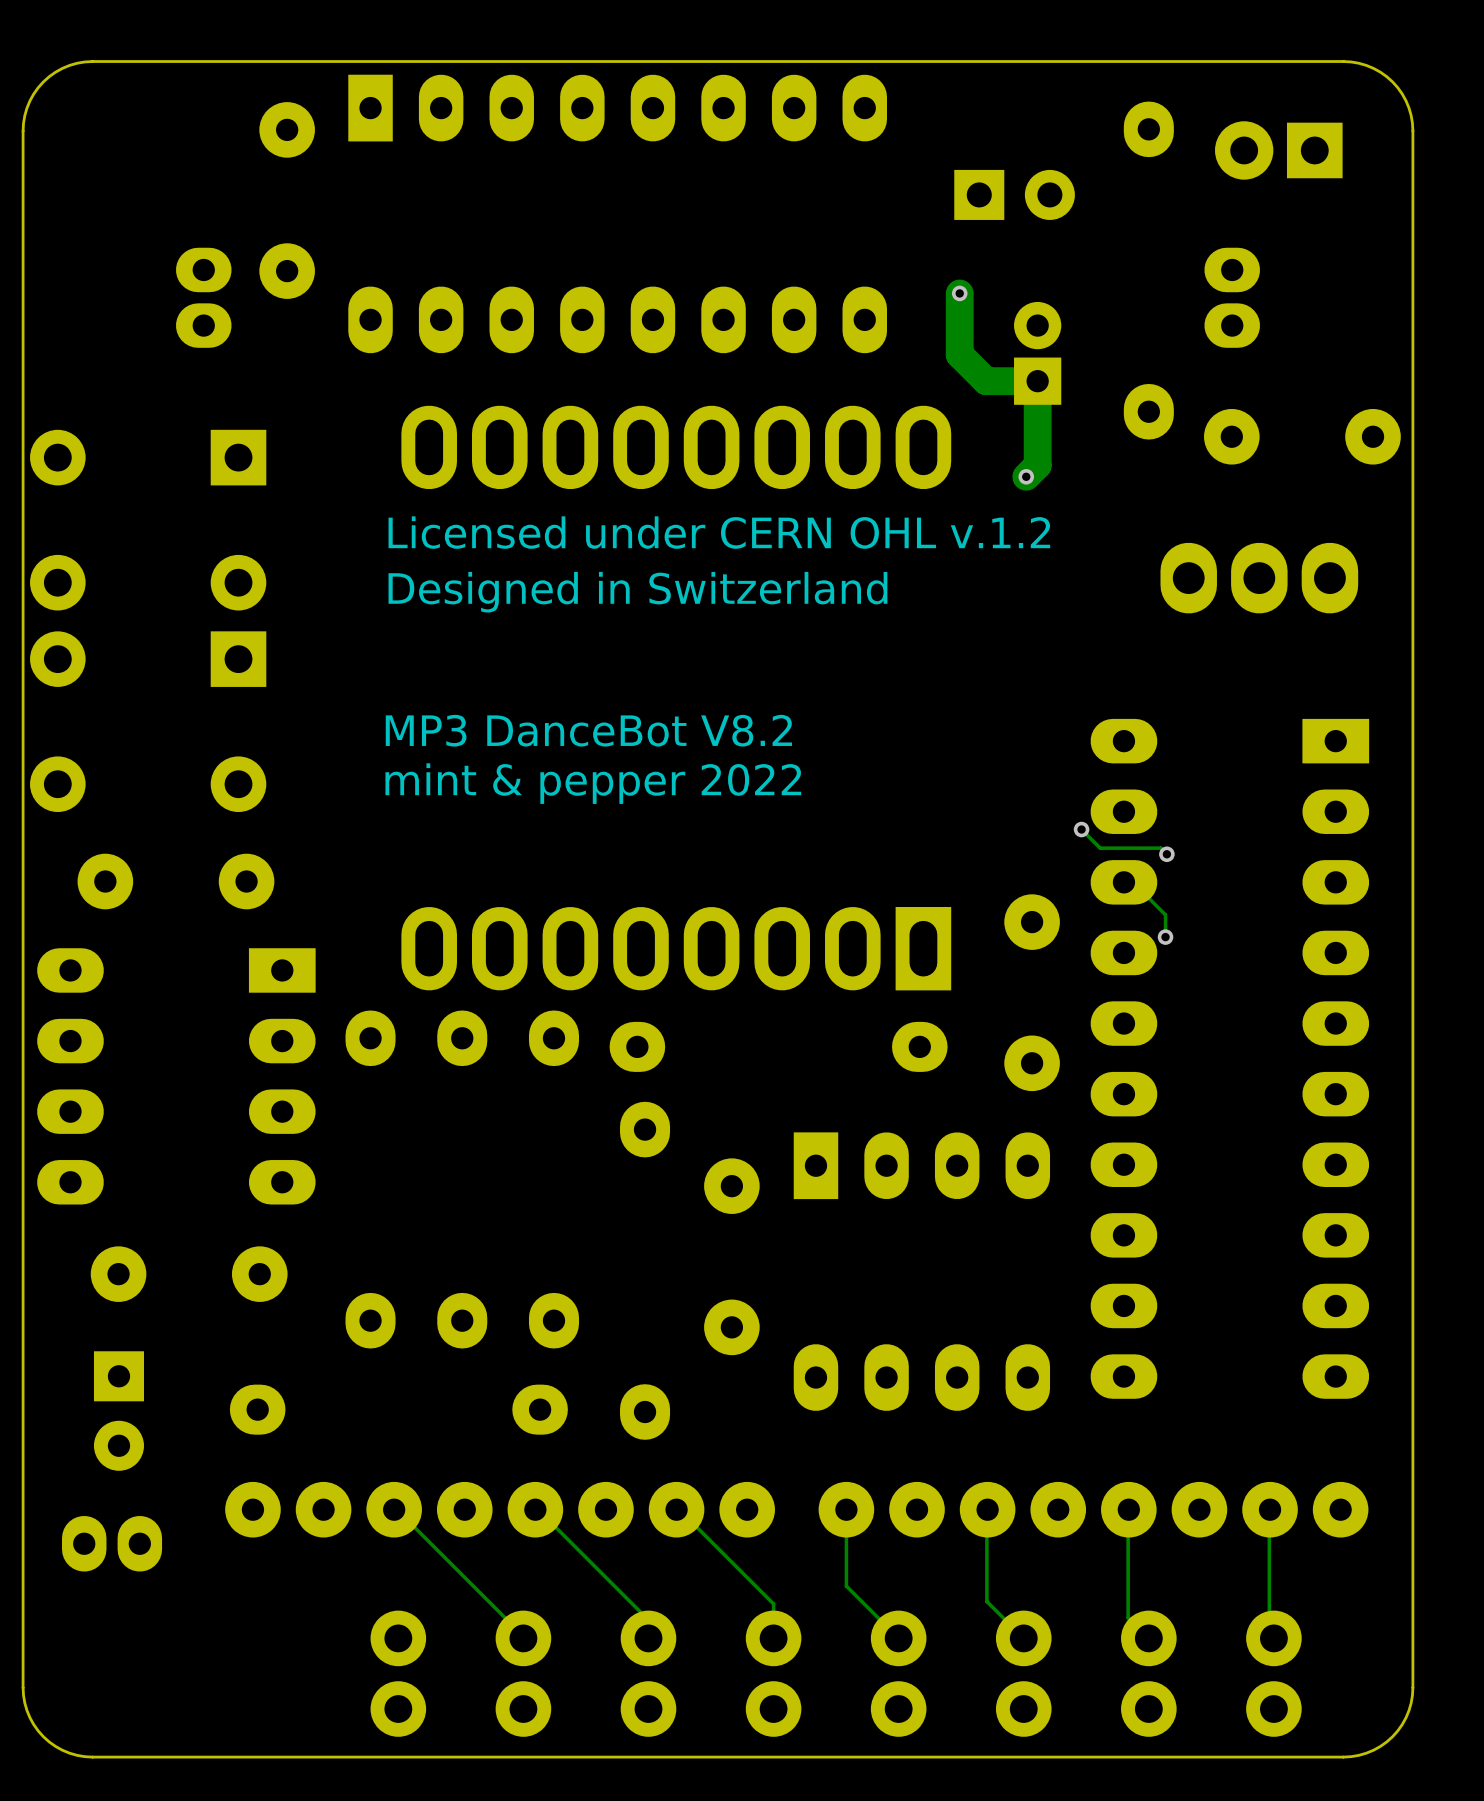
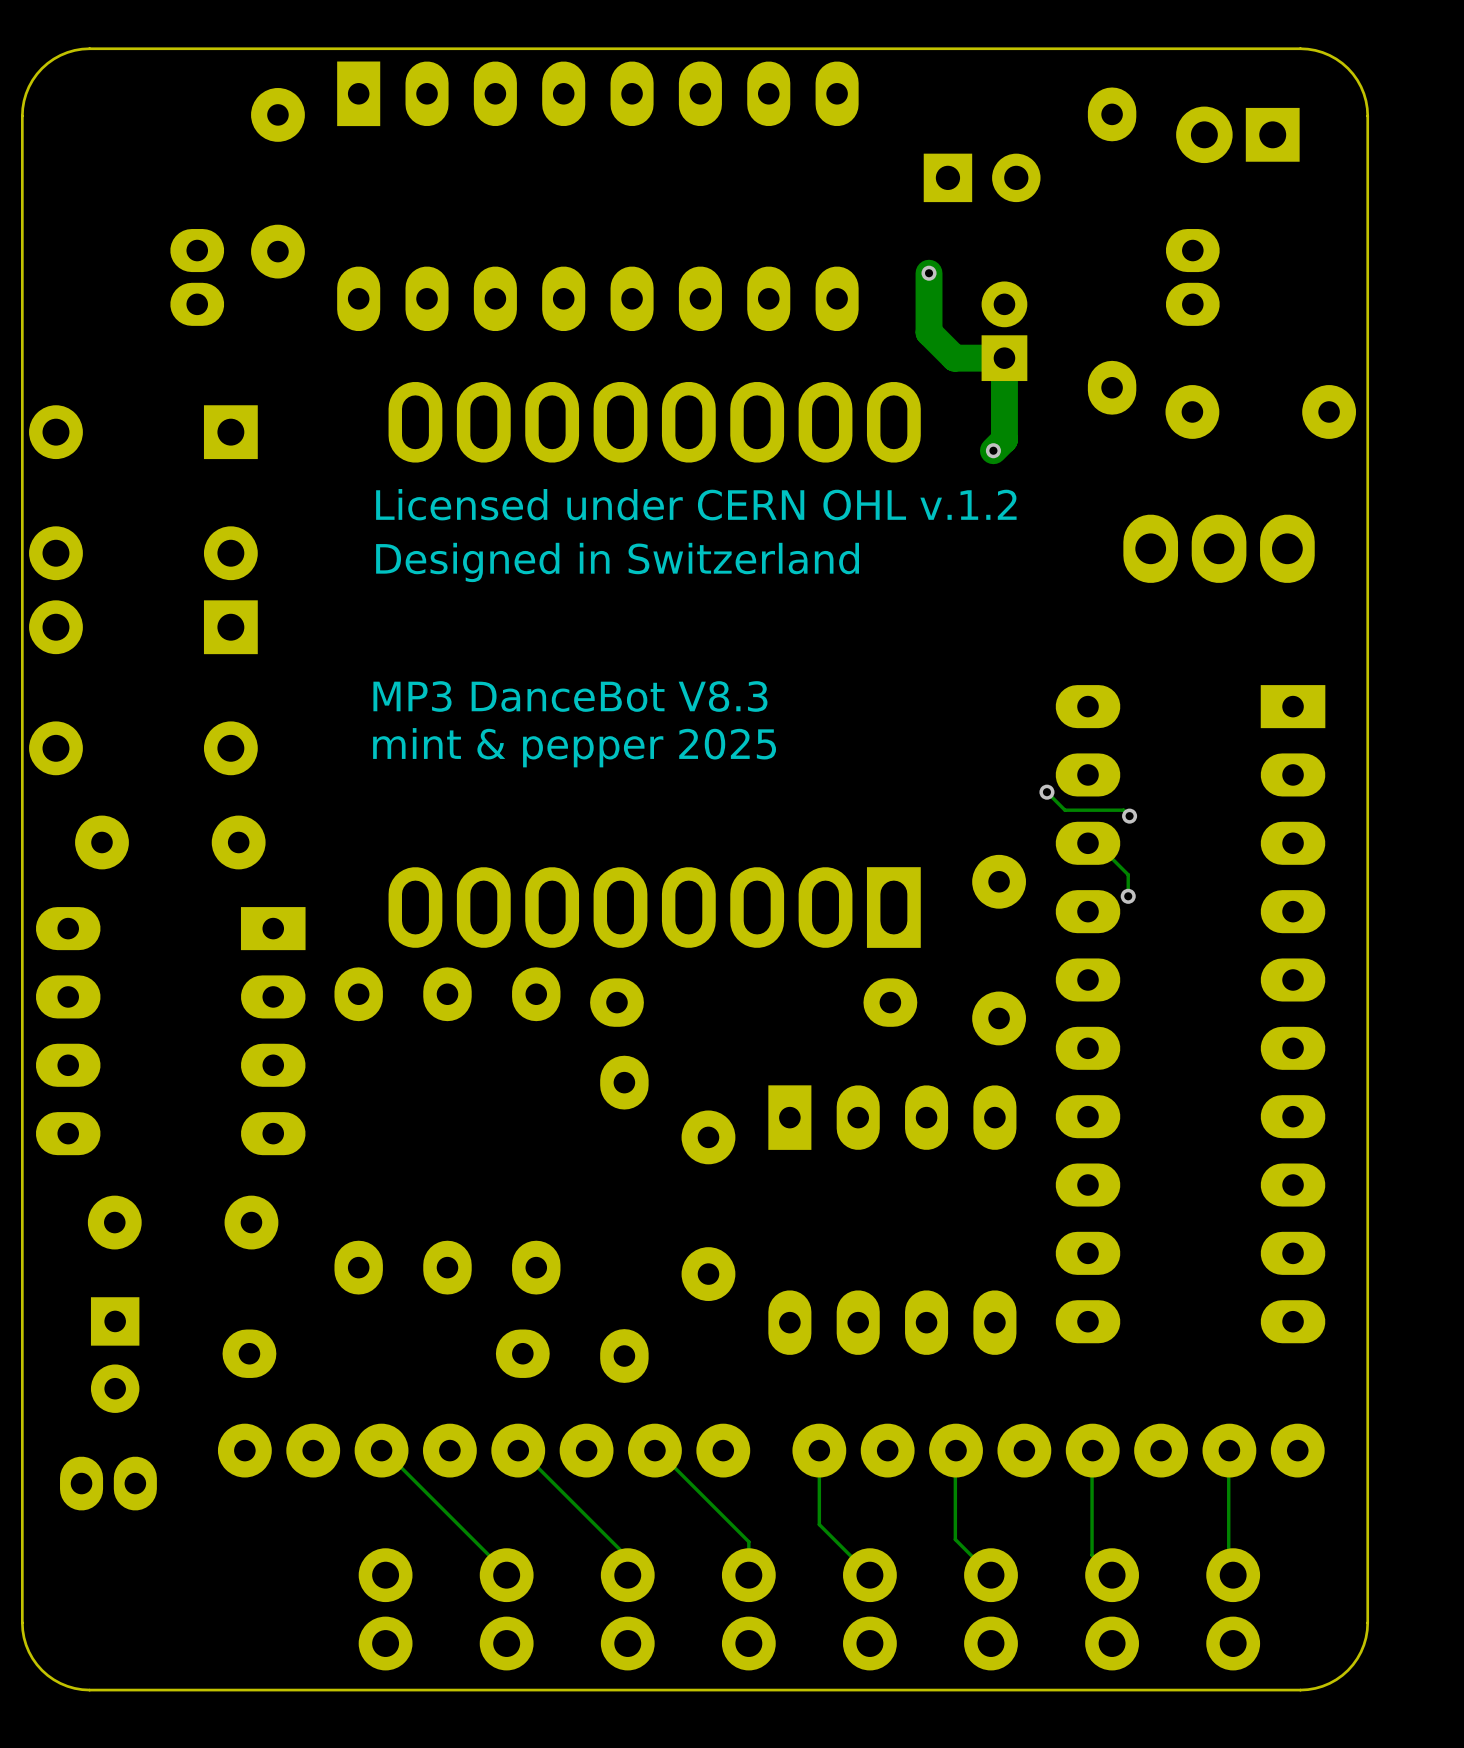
text: MP3 DanceBot V8.2 (588, 730) -> MP3 DanceBot V8.3 (570, 696)
text: mint & pepper 2022 (593, 783) -> mint & pepper 2025 (574, 747)

